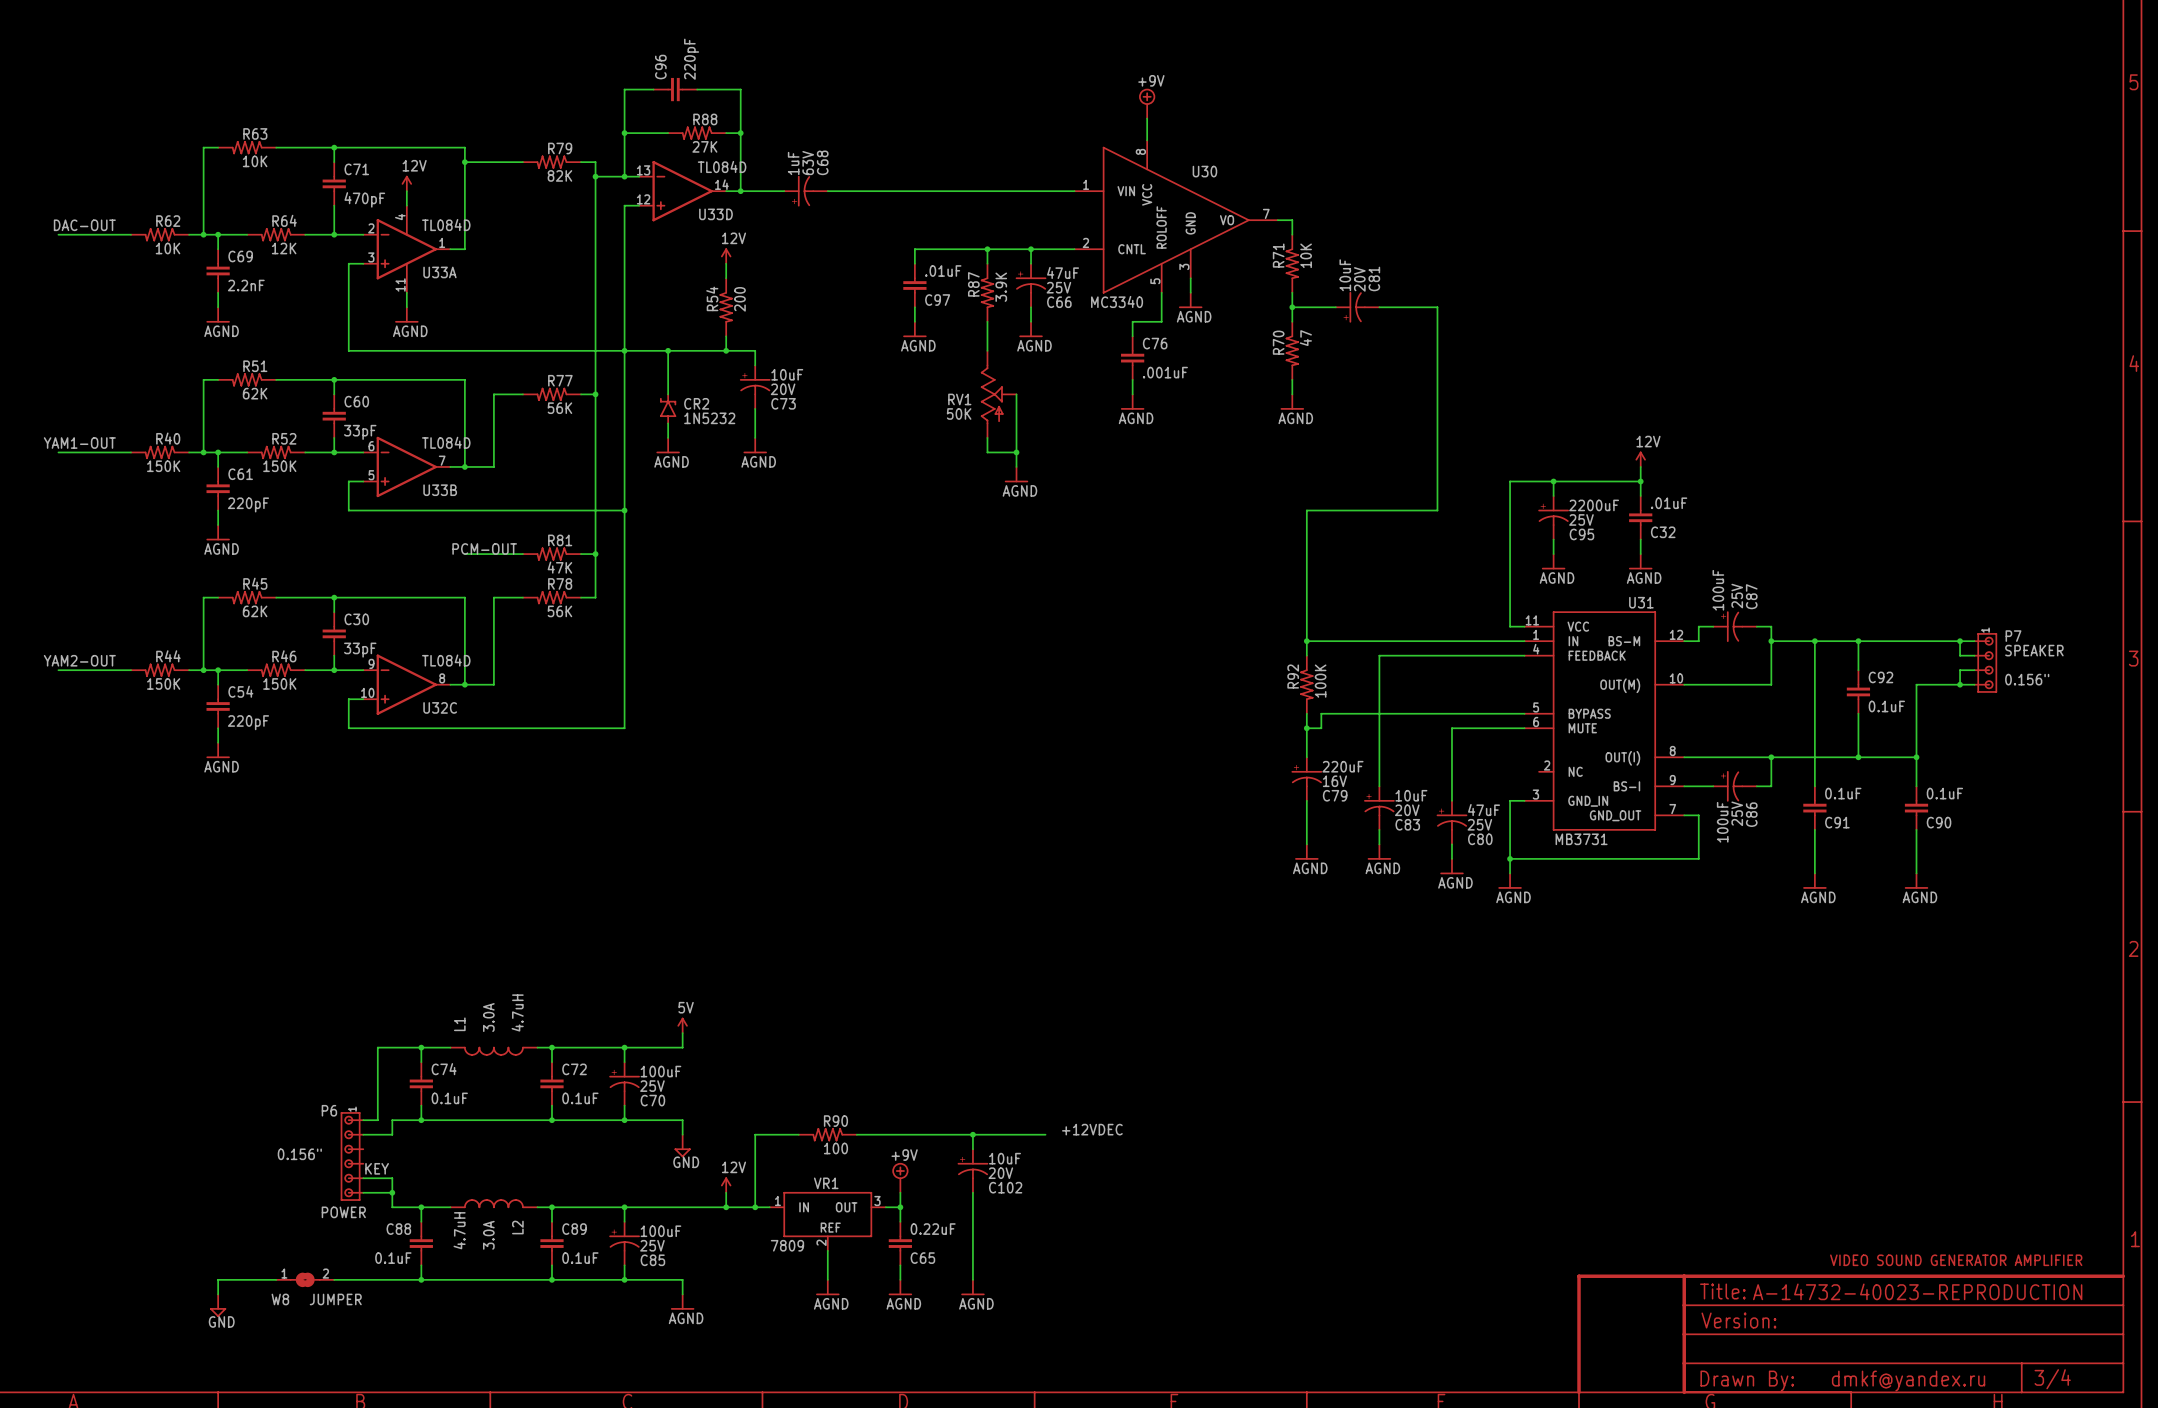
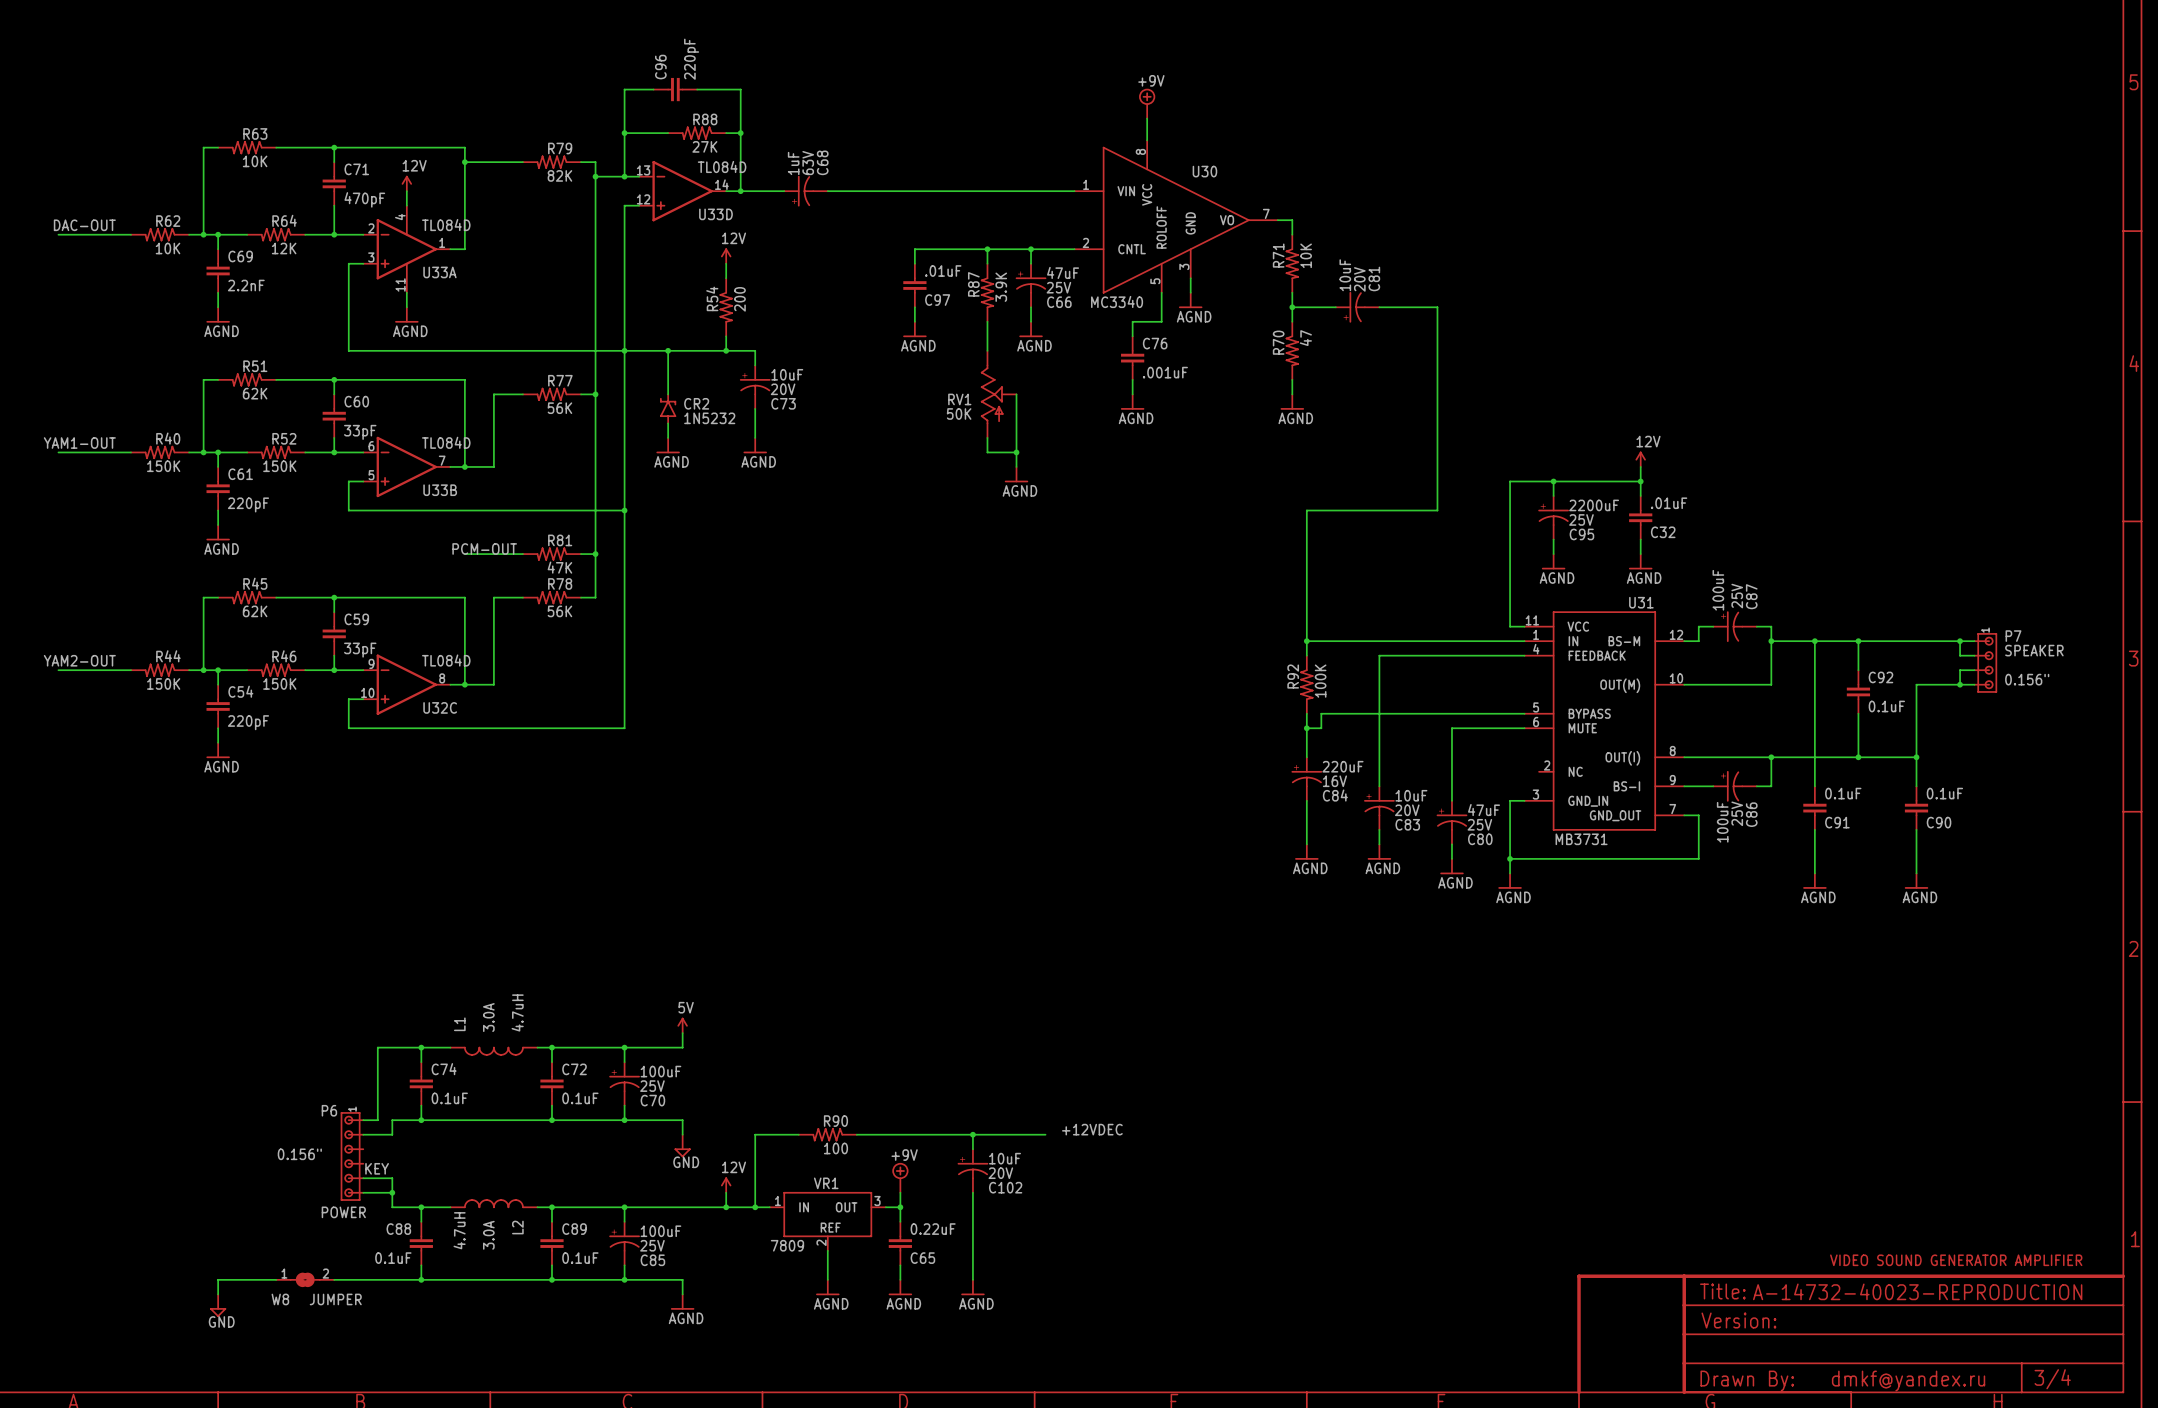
C30 name: C30 (356, 619) -> C59 (356, 619)
C79 name: C79 (1335, 795) -> C84 (1335, 795)

